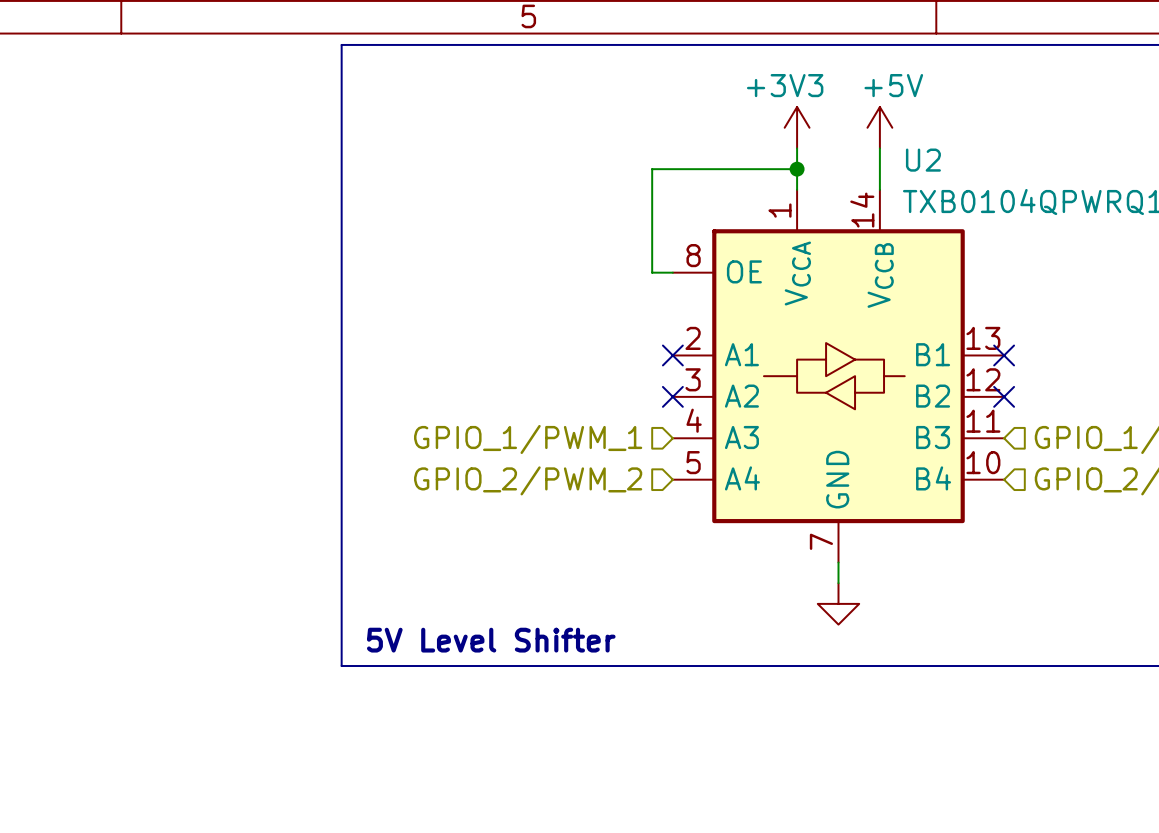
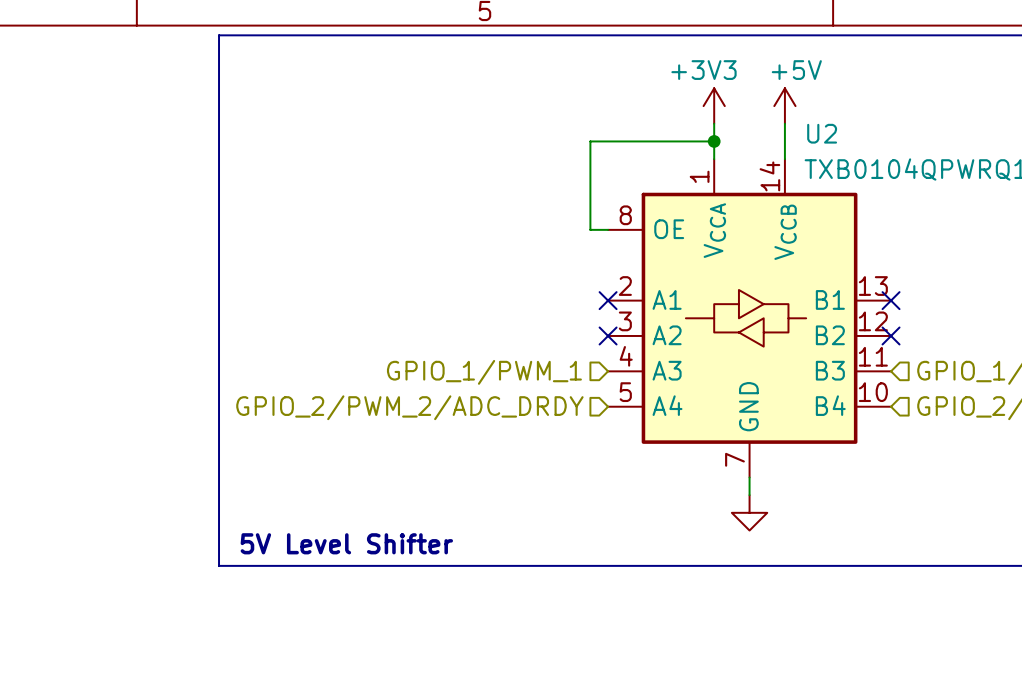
line: (341, 44) (341, 666) -> (325, 35) (219, 35) (219, 565) (325, 565)
hierarchical label: GPIO_2/PWM_2 (528, 480) -> GPIO_2/PWM_2/ADC_DRDY (409, 407)
text position: 5V Level Shifter (491, 640) -> 5V Level Shifter (346, 543)

